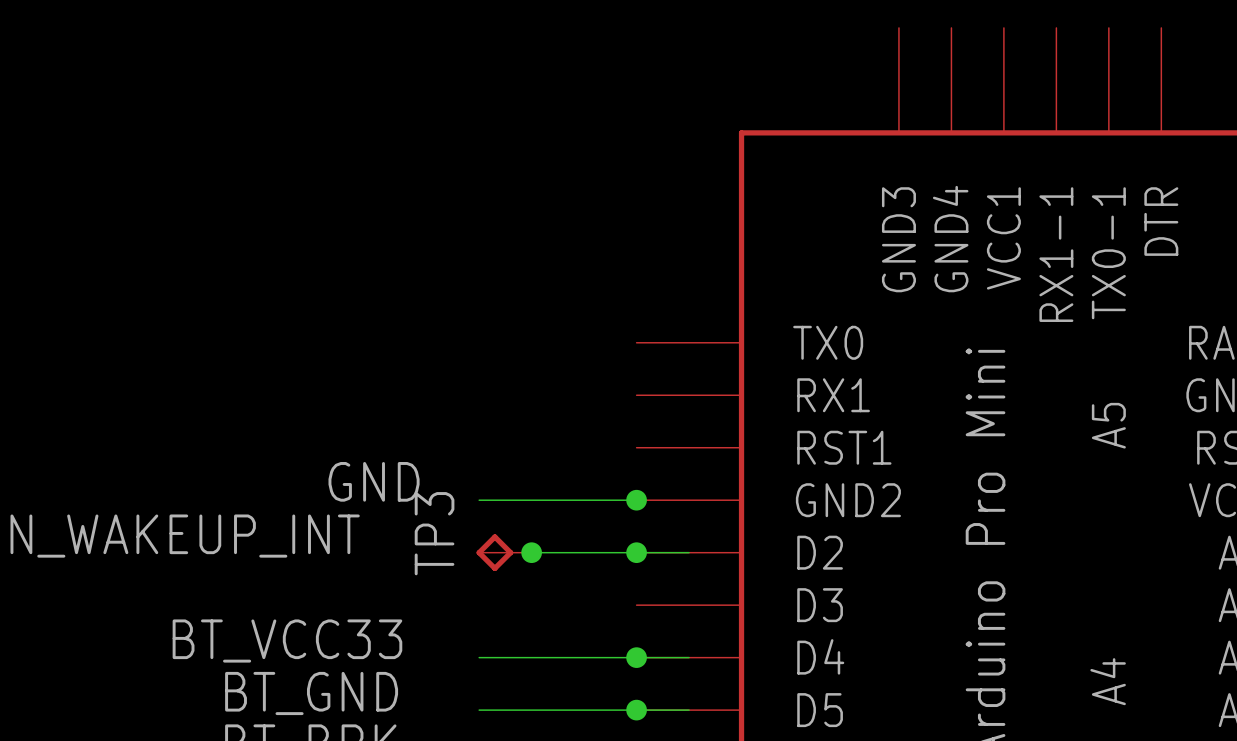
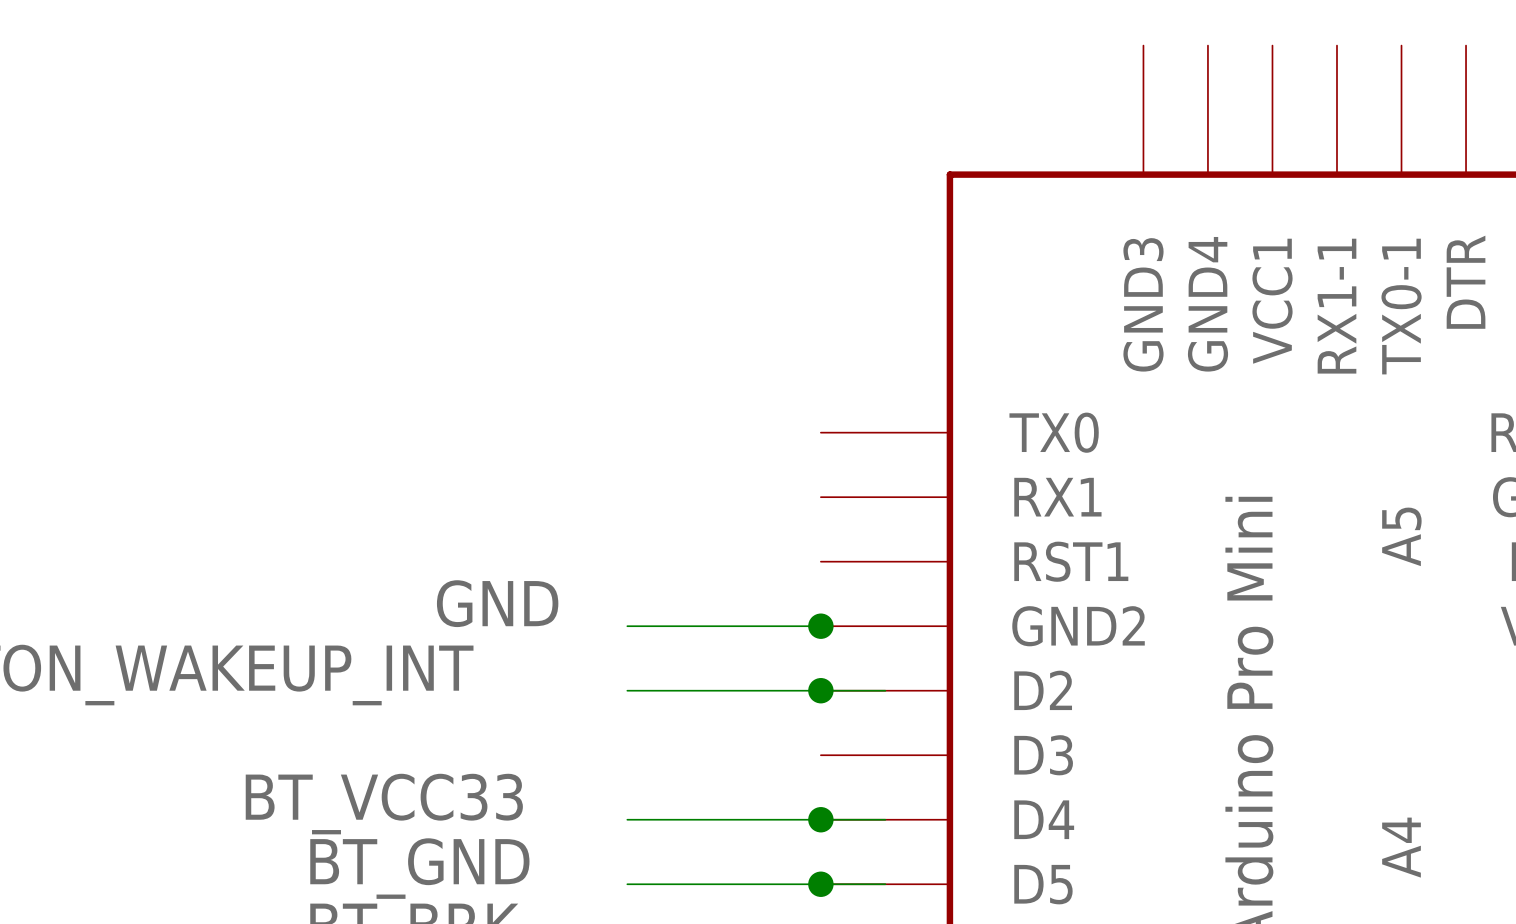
TP3: (504, 552) -> none
junction: (531, 552) -> none

